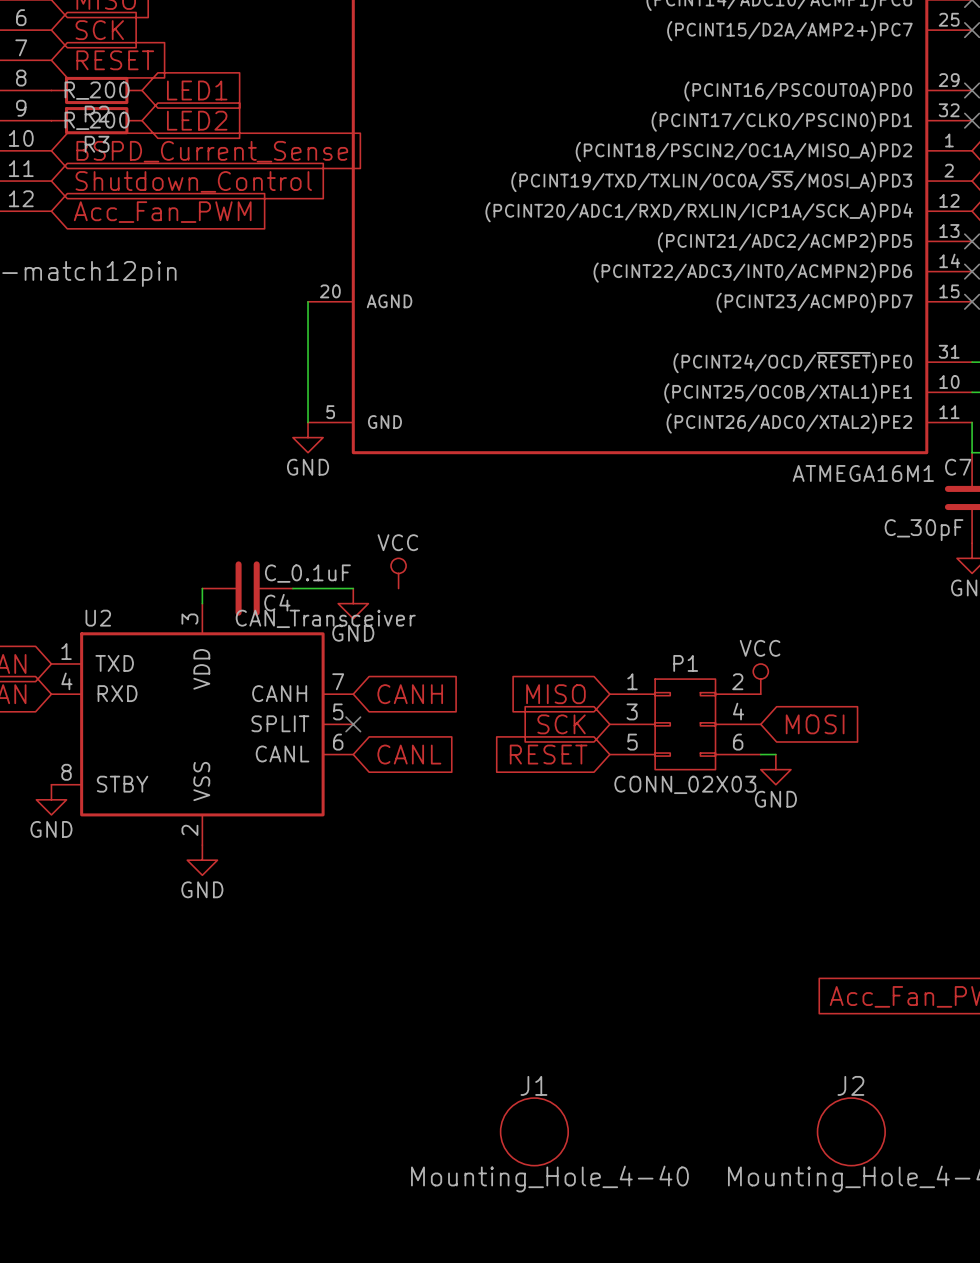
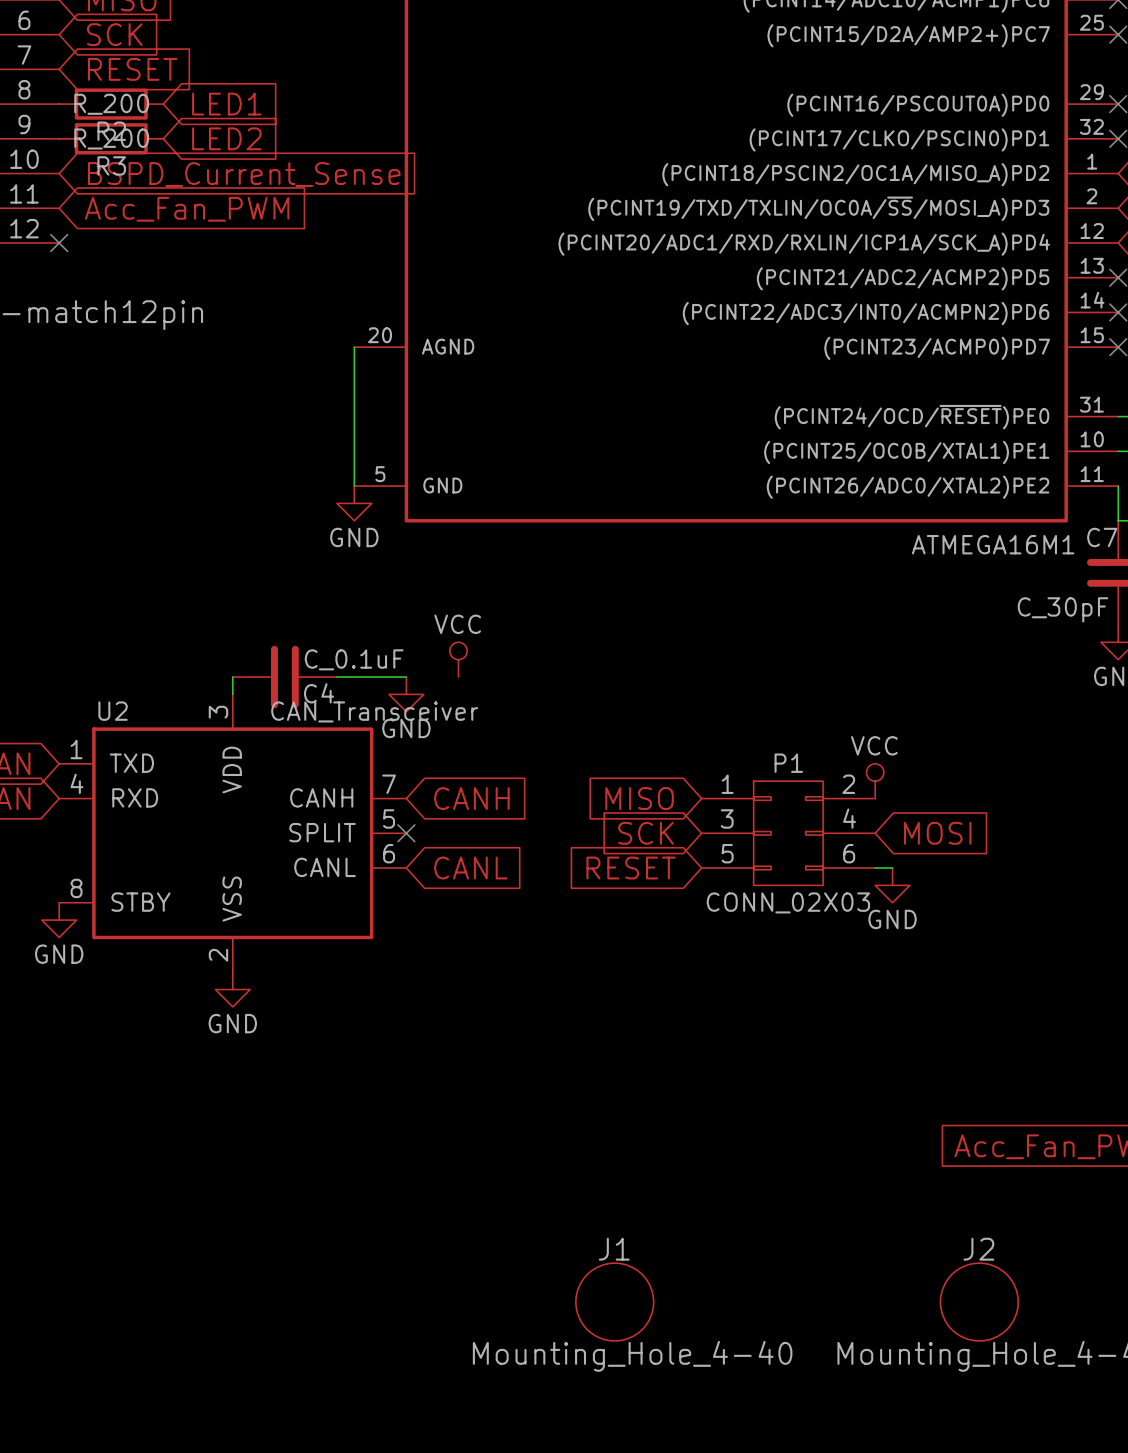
global label: Shutdown_Control (193, 181) -> Acc_Fan_PWM (187, 209)
no-connect mark: none -> (59, 242)
global label: Acc_Fan_PWM (162, 212) -> none

